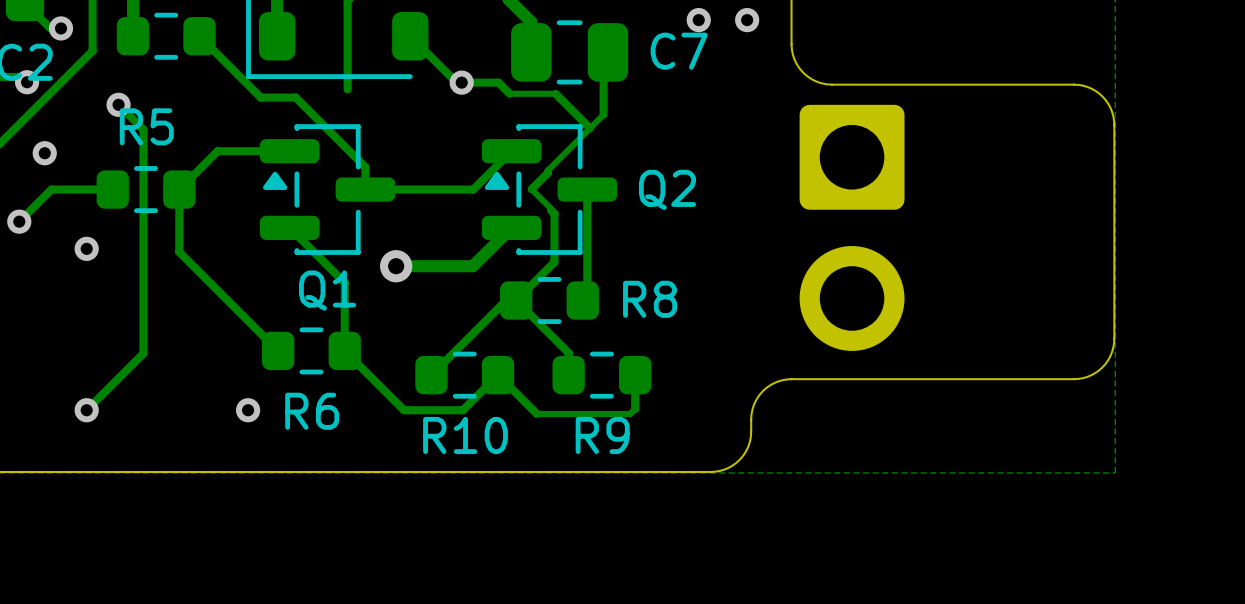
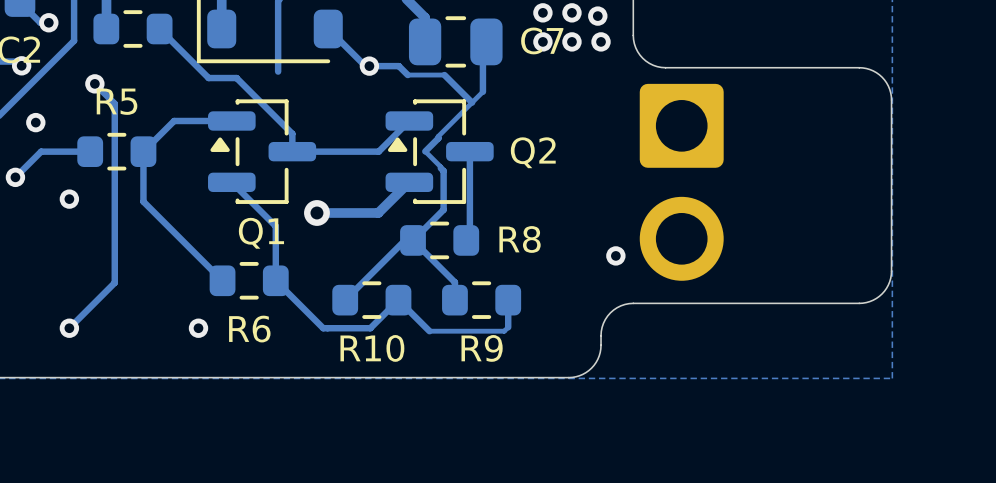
via: none -> (542, 12)
via: none -> (571, 12)
via: (698, 20) -> none
via: none -> (542, 41)
via: none -> (571, 41)
via: none -> (601, 41)
via: none -> (615, 255)

